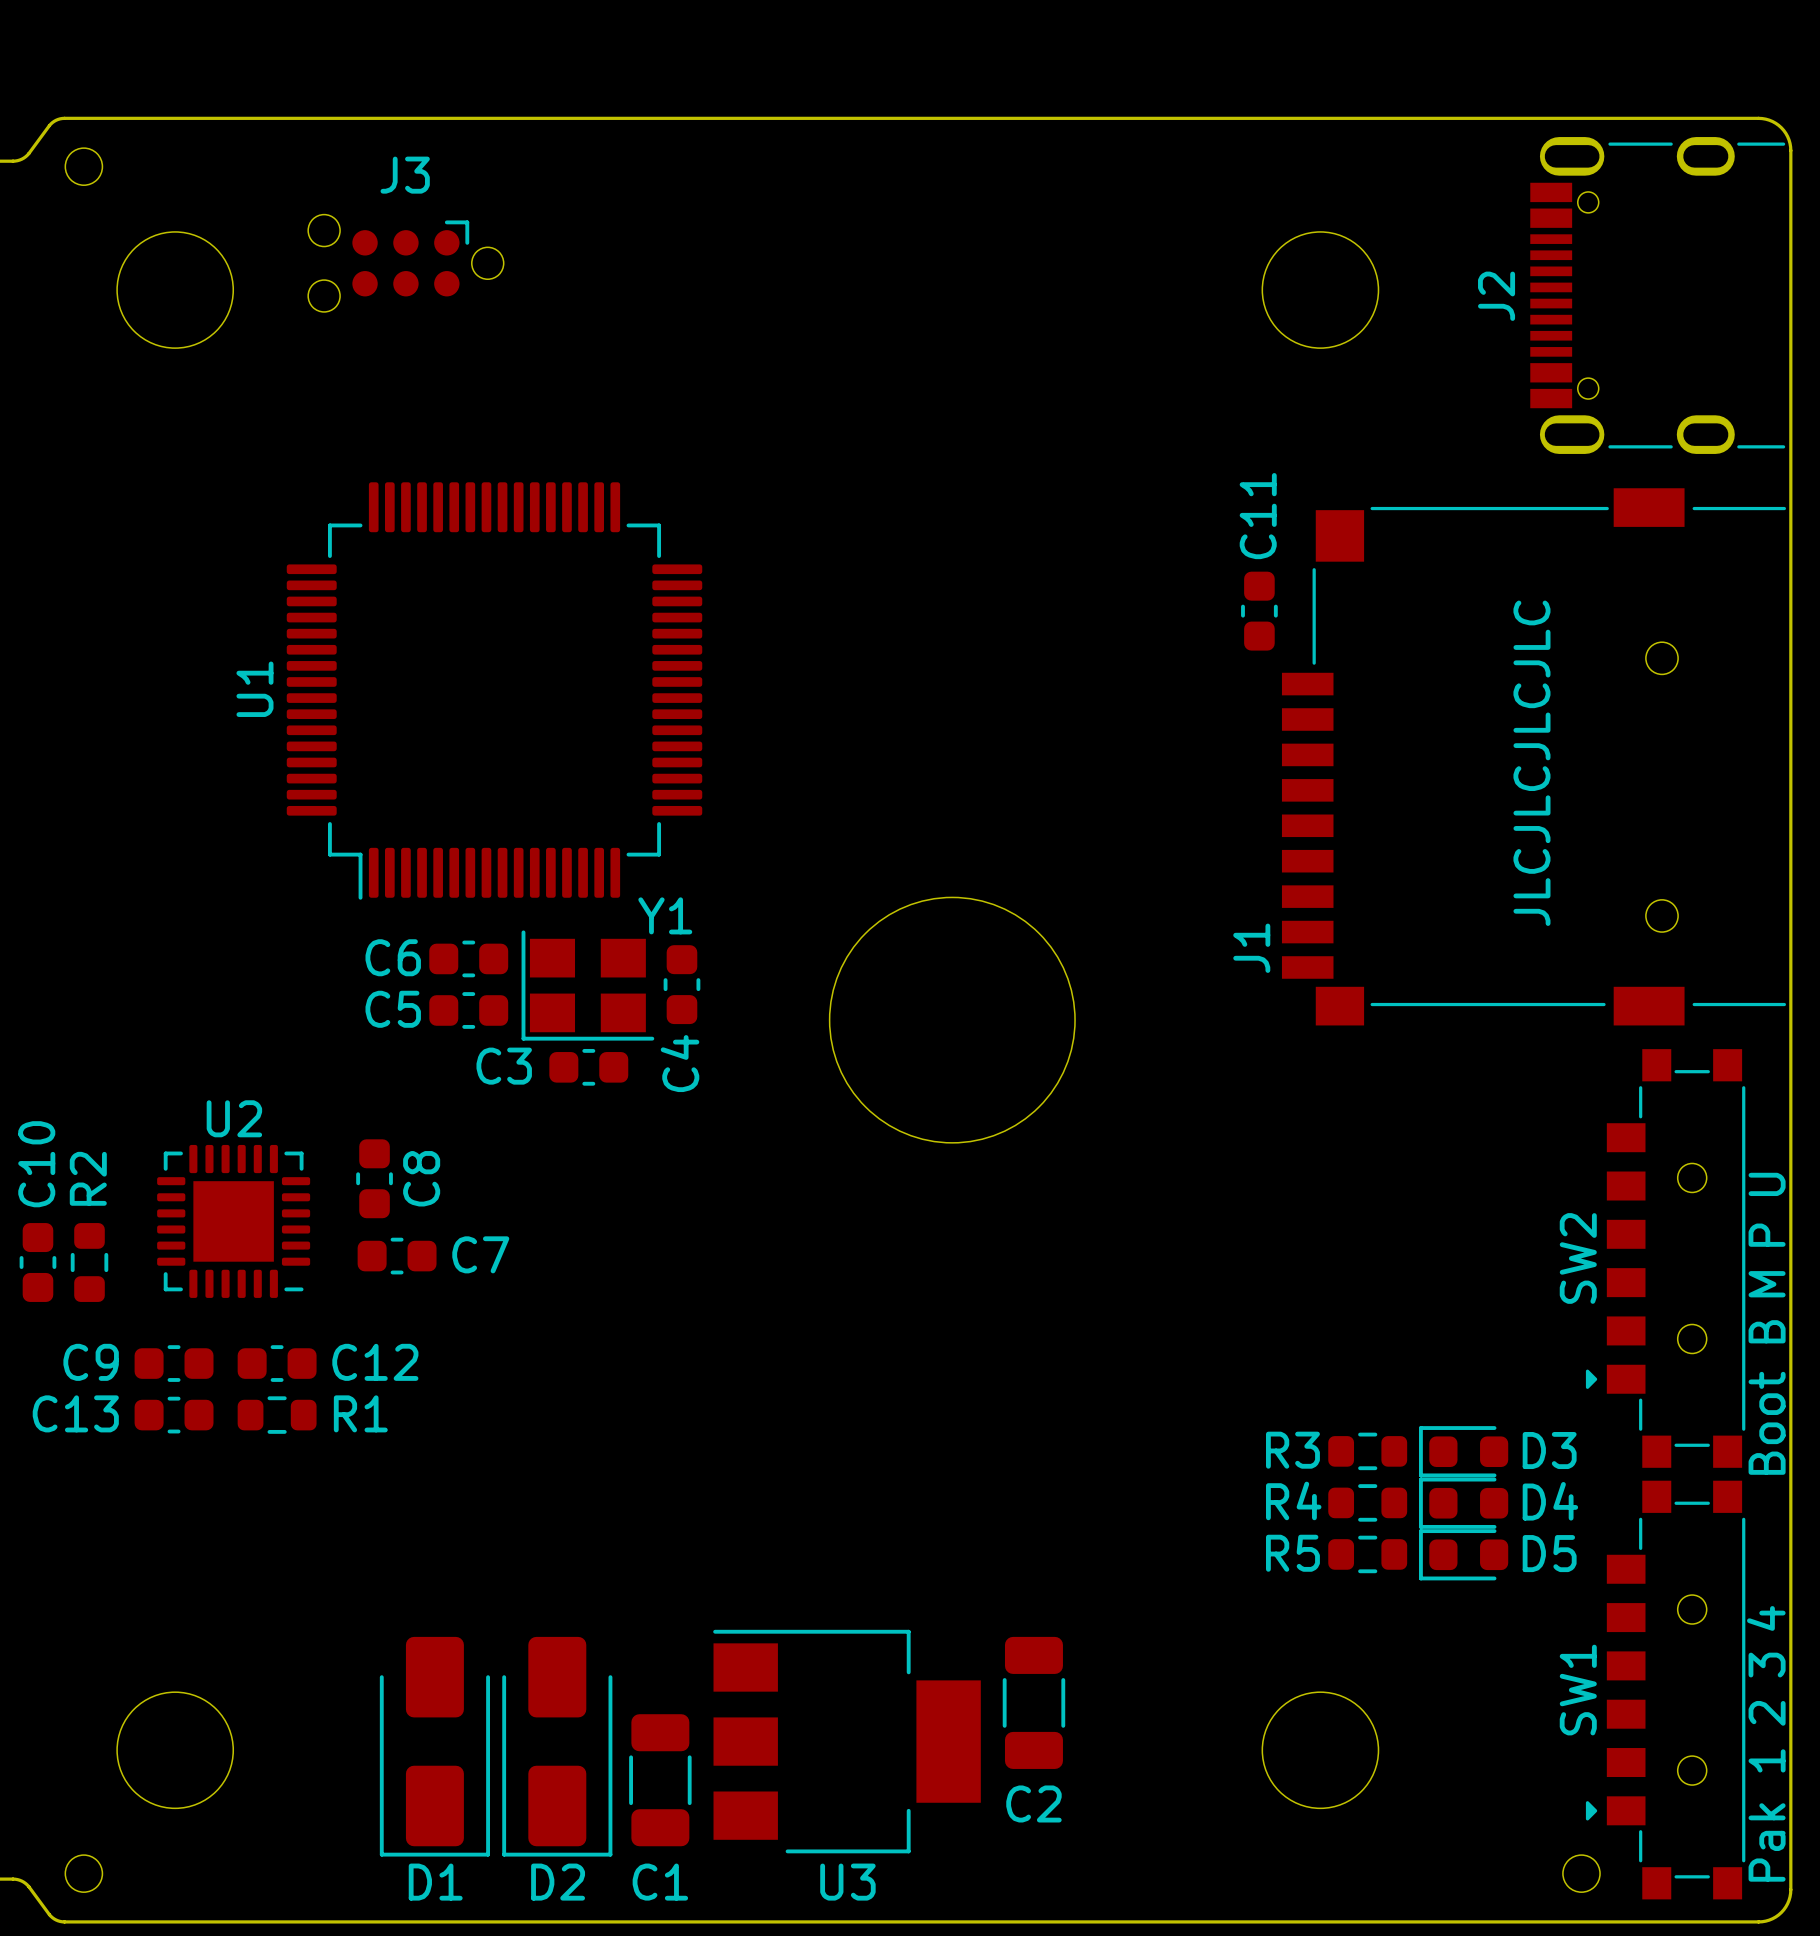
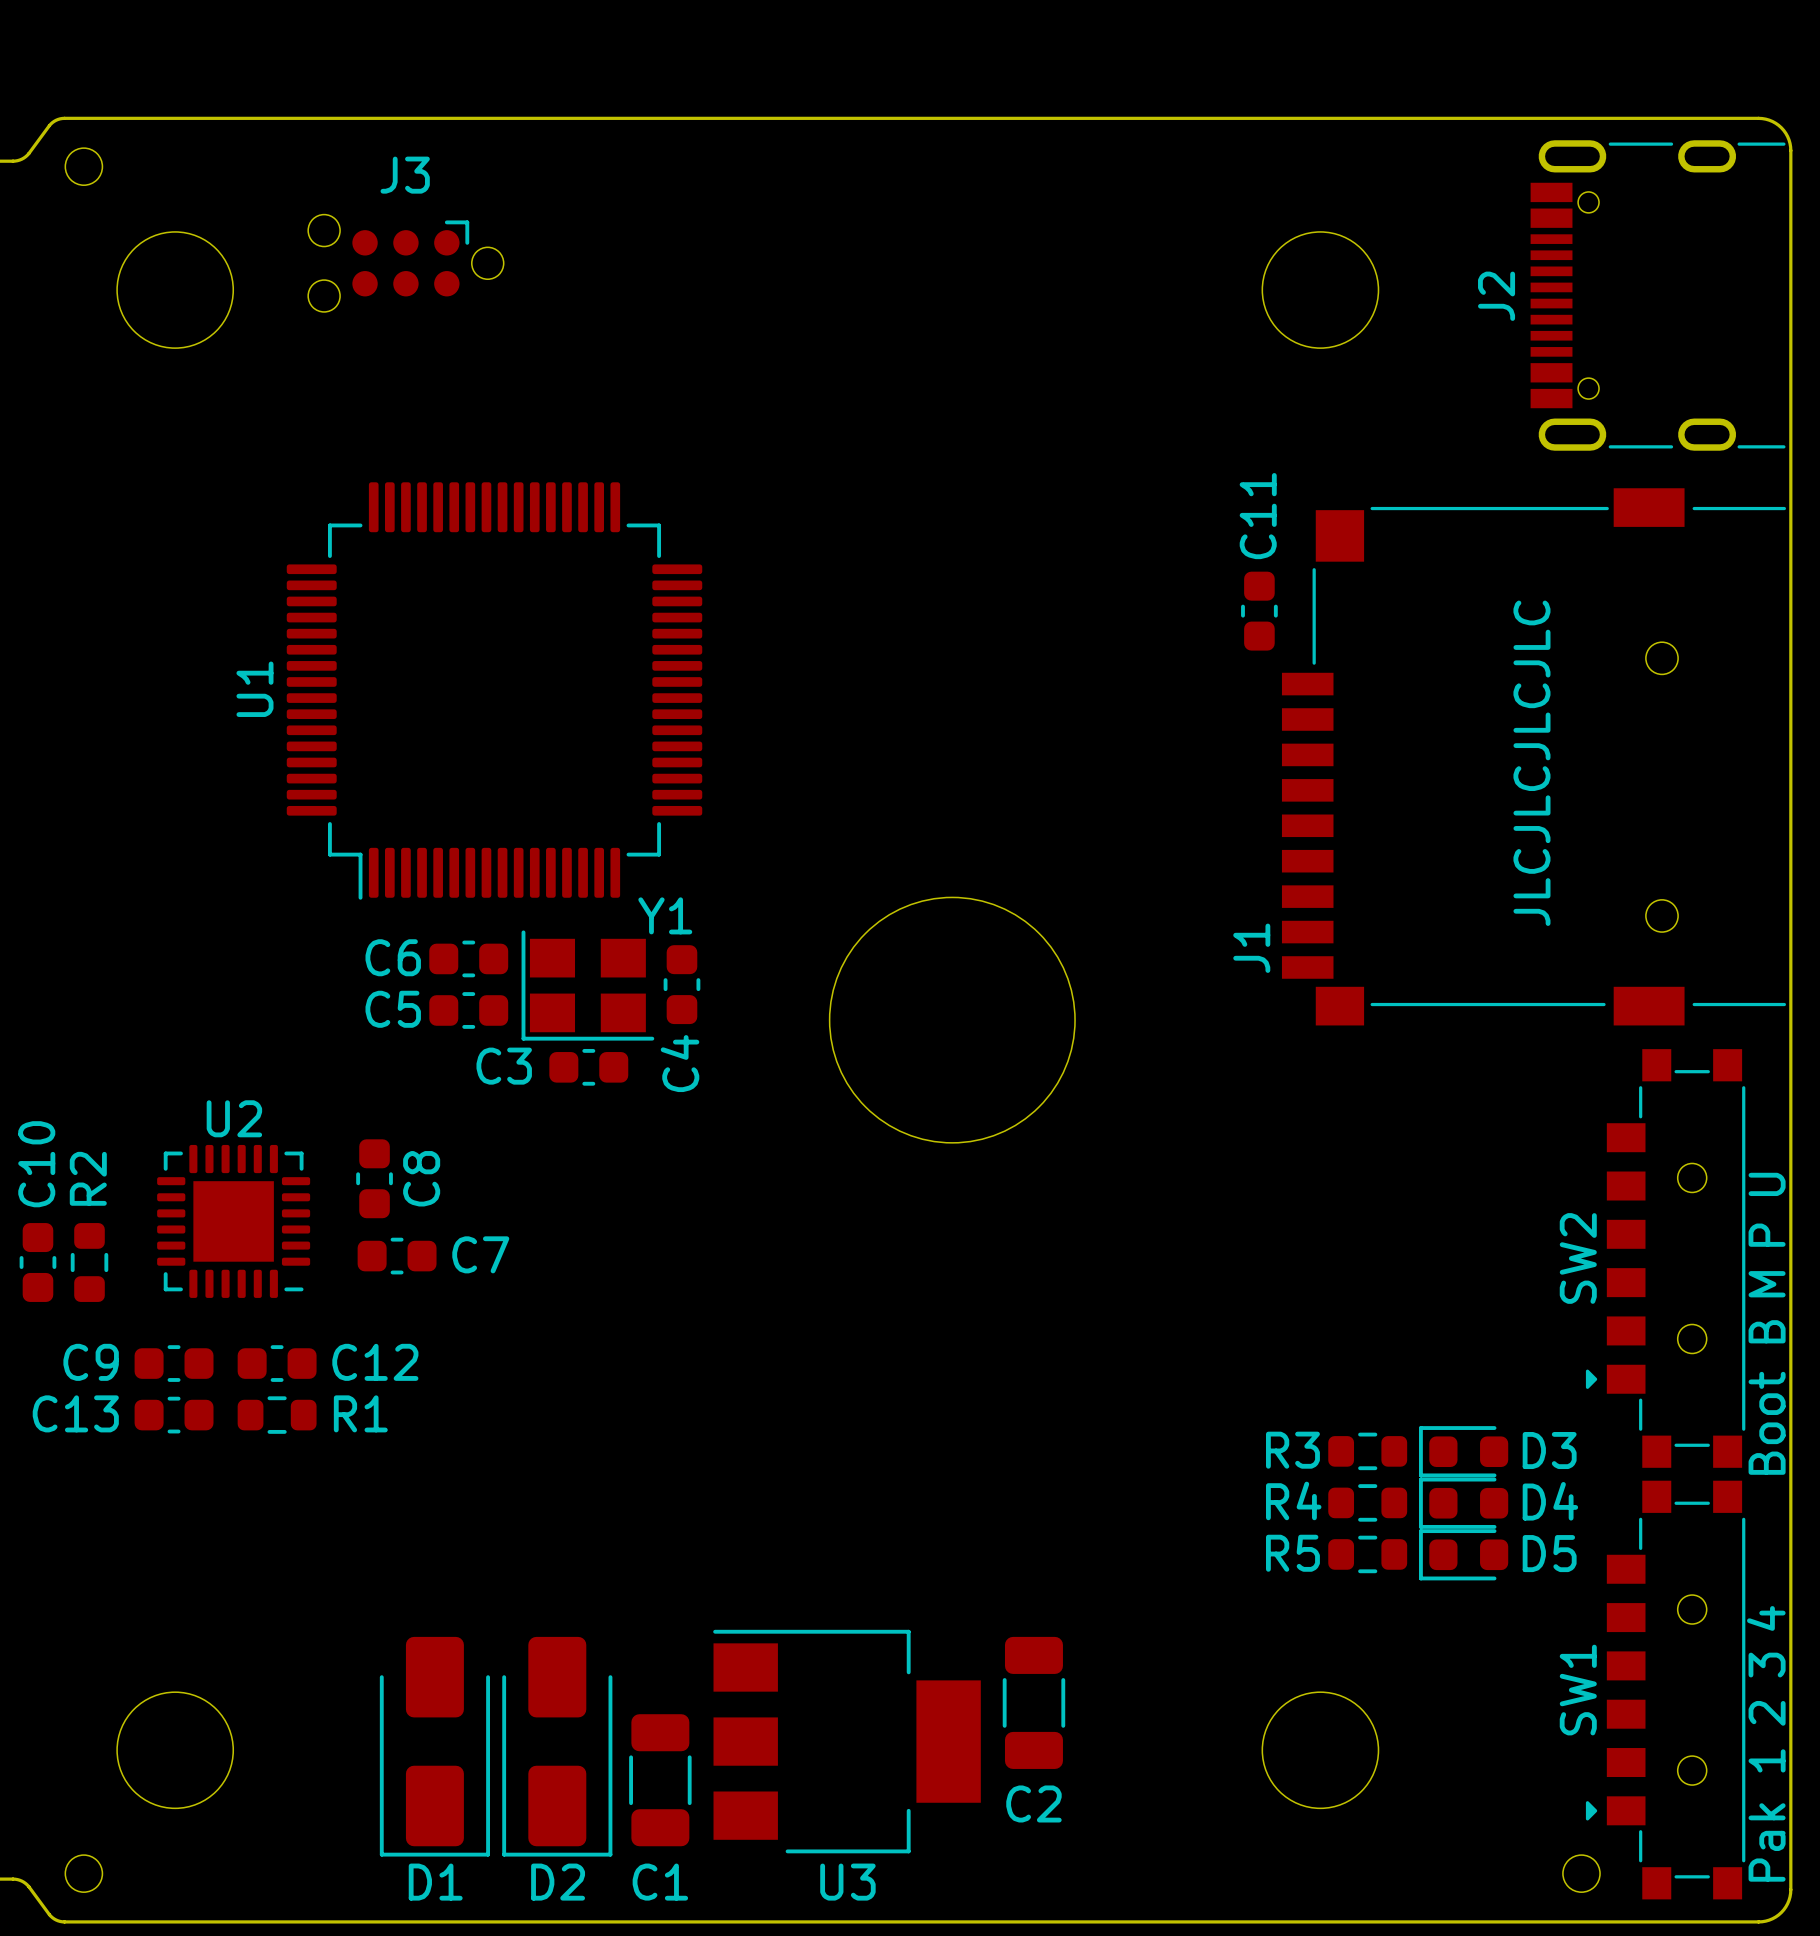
J2 footprint: [1530, 137, 1786, 454] -> [1530, 140, 1786, 451]

